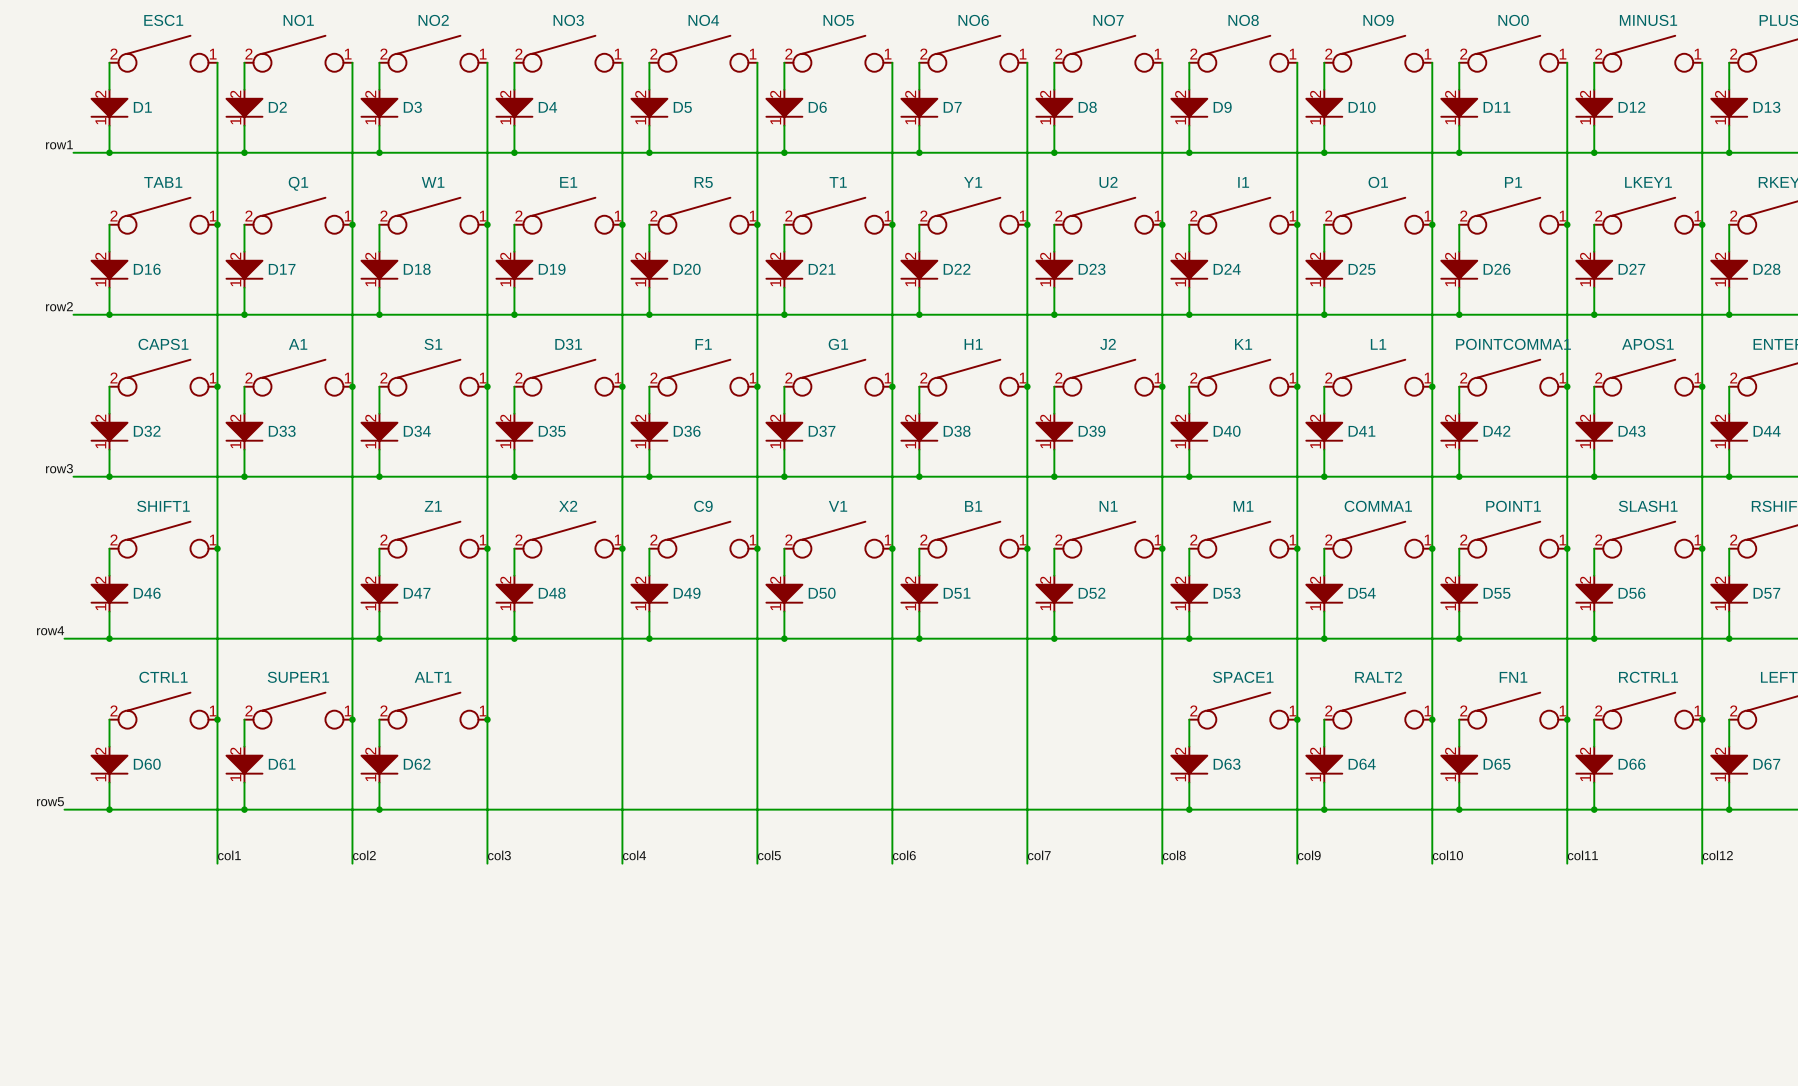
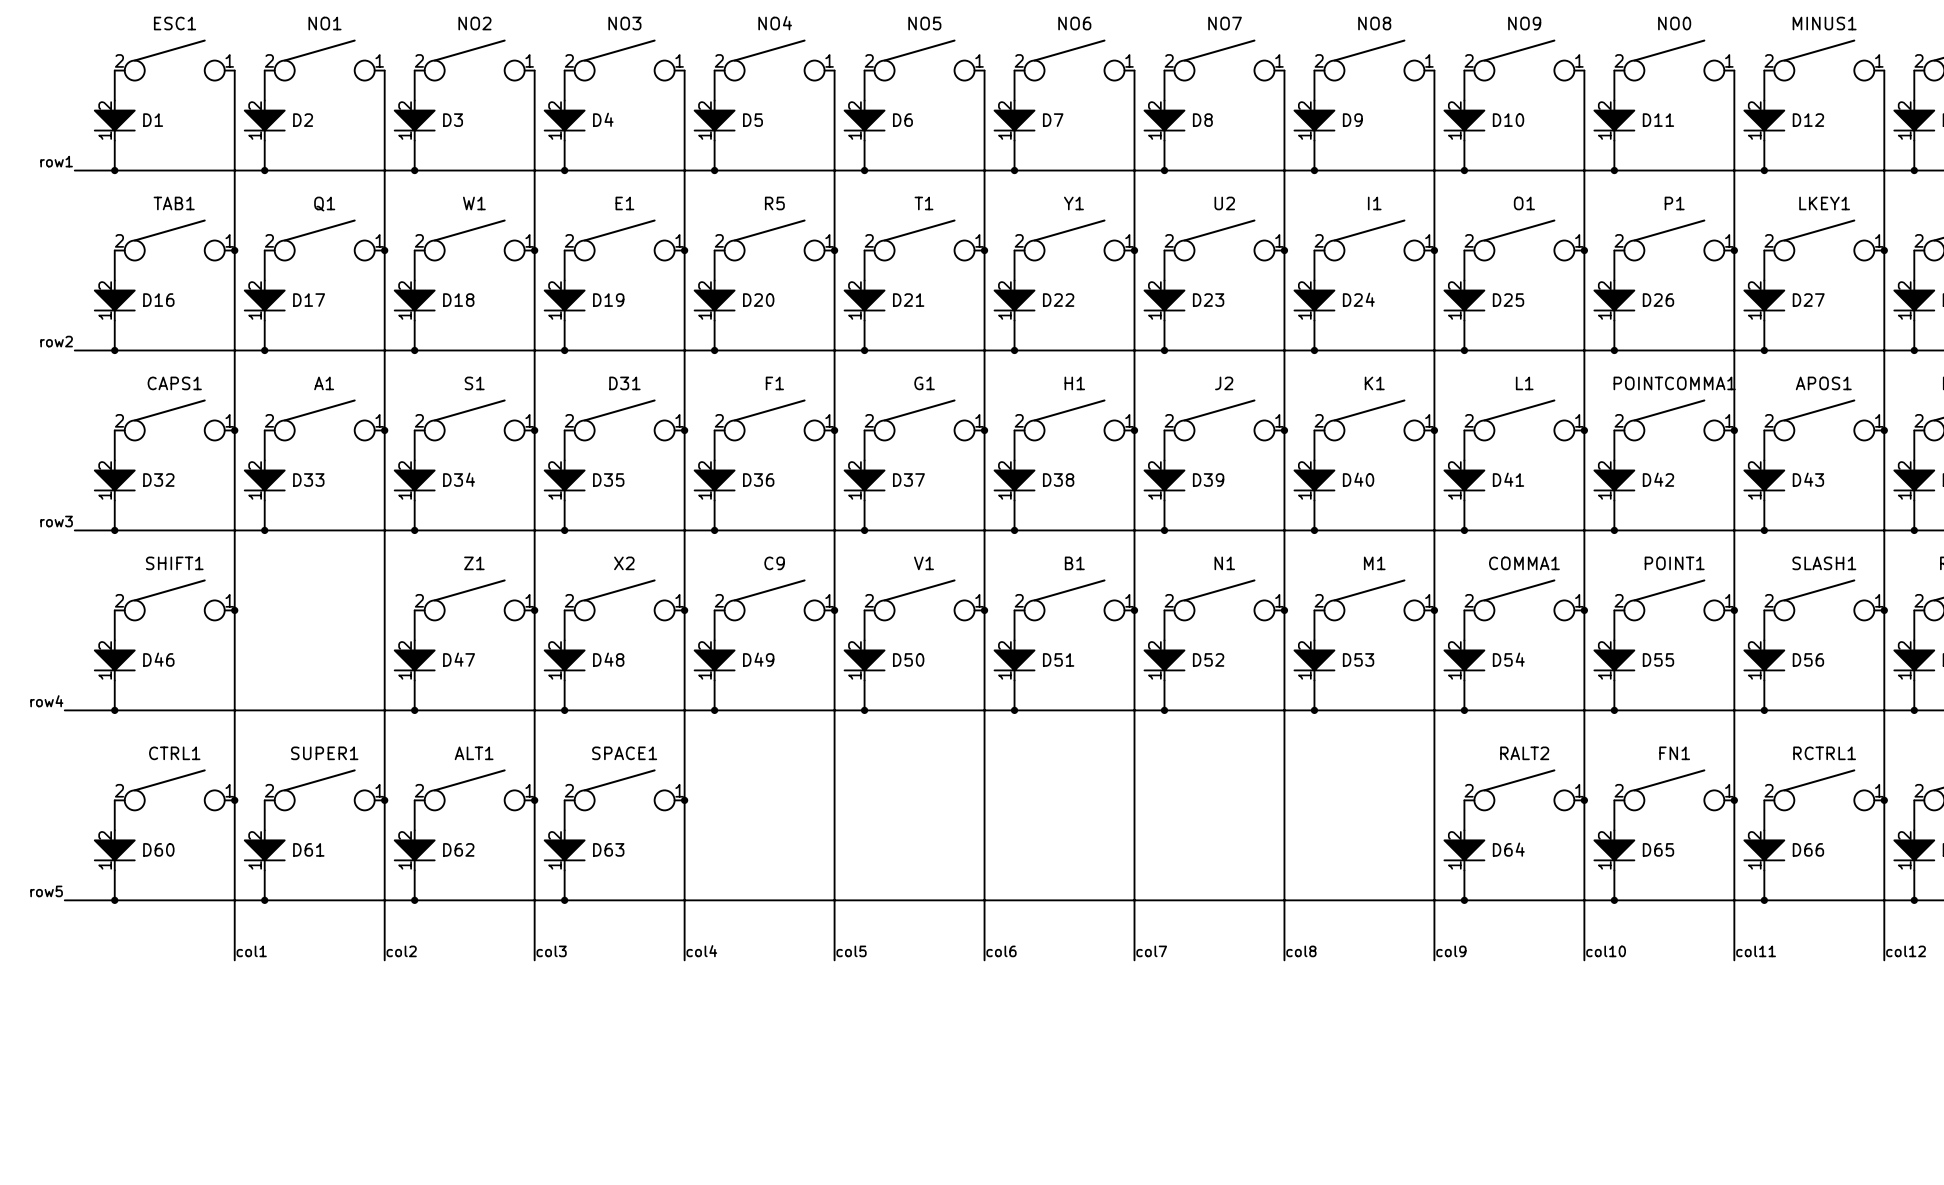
SPACE1 position: (1243, 710) -> (624, 789)
wire: none -> (564, 800) (564, 830)
junction: none -> (684, 800)
wire: (1189, 719) (1189, 746) -> none
junction: (1297, 719) -> none
D63 position: (1189, 764) -> (564, 850)
wire: none -> (564, 870) (564, 900)
wire: (1189, 782) (1189, 809) -> none
junction: none -> (564, 900)
junction: (1189, 809) -> none

